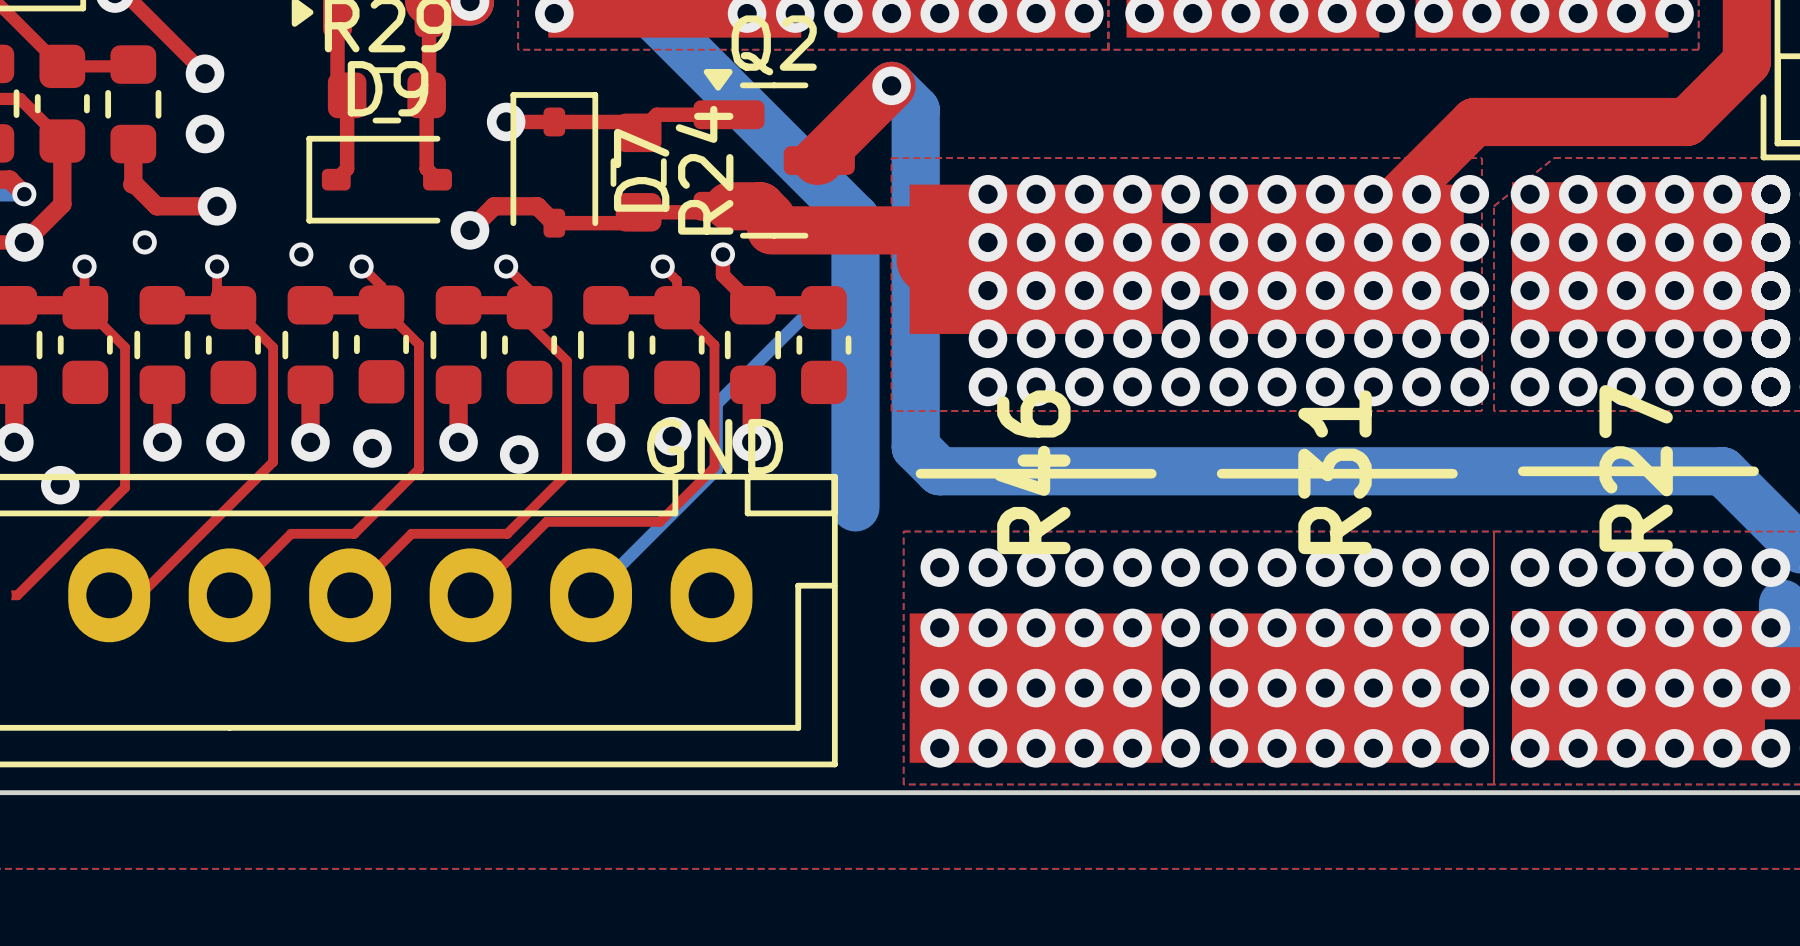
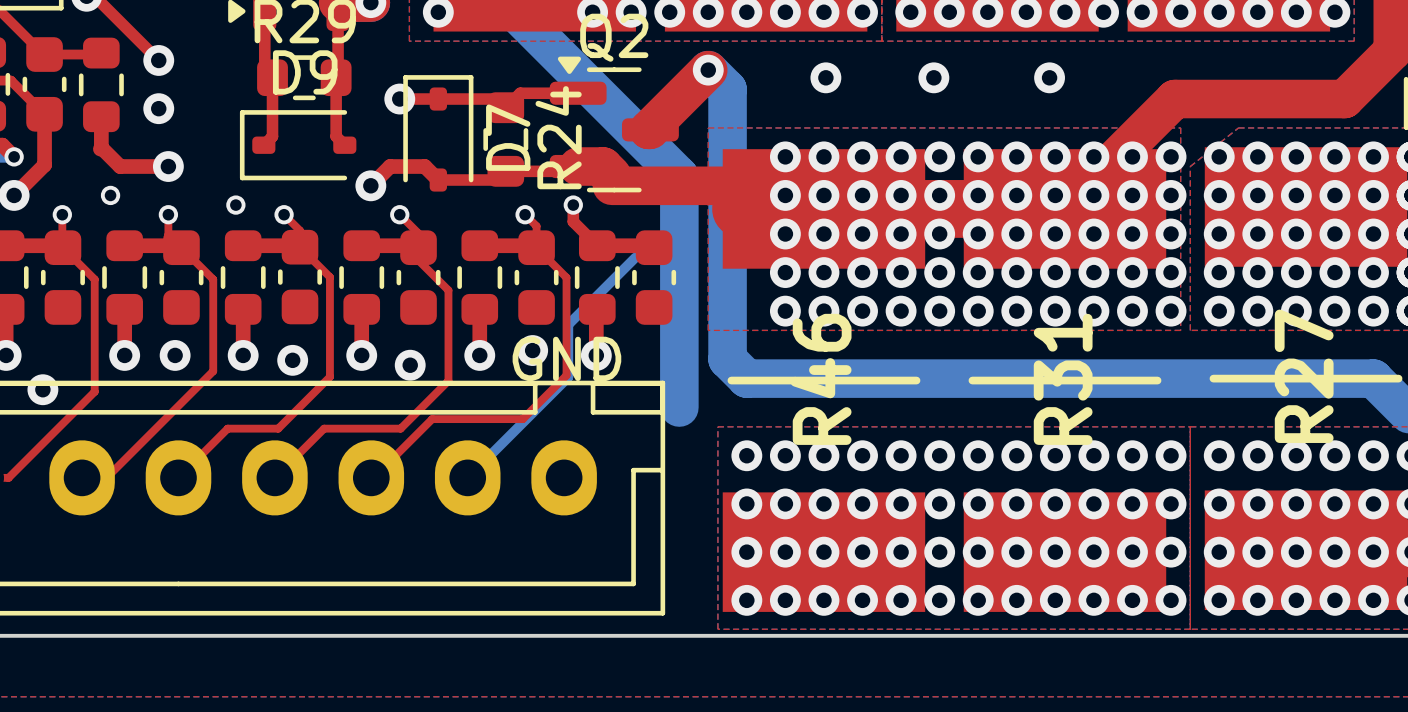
via: none -> (825, 77)
via: none -> (933, 77)
via: none -> (1049, 77)

